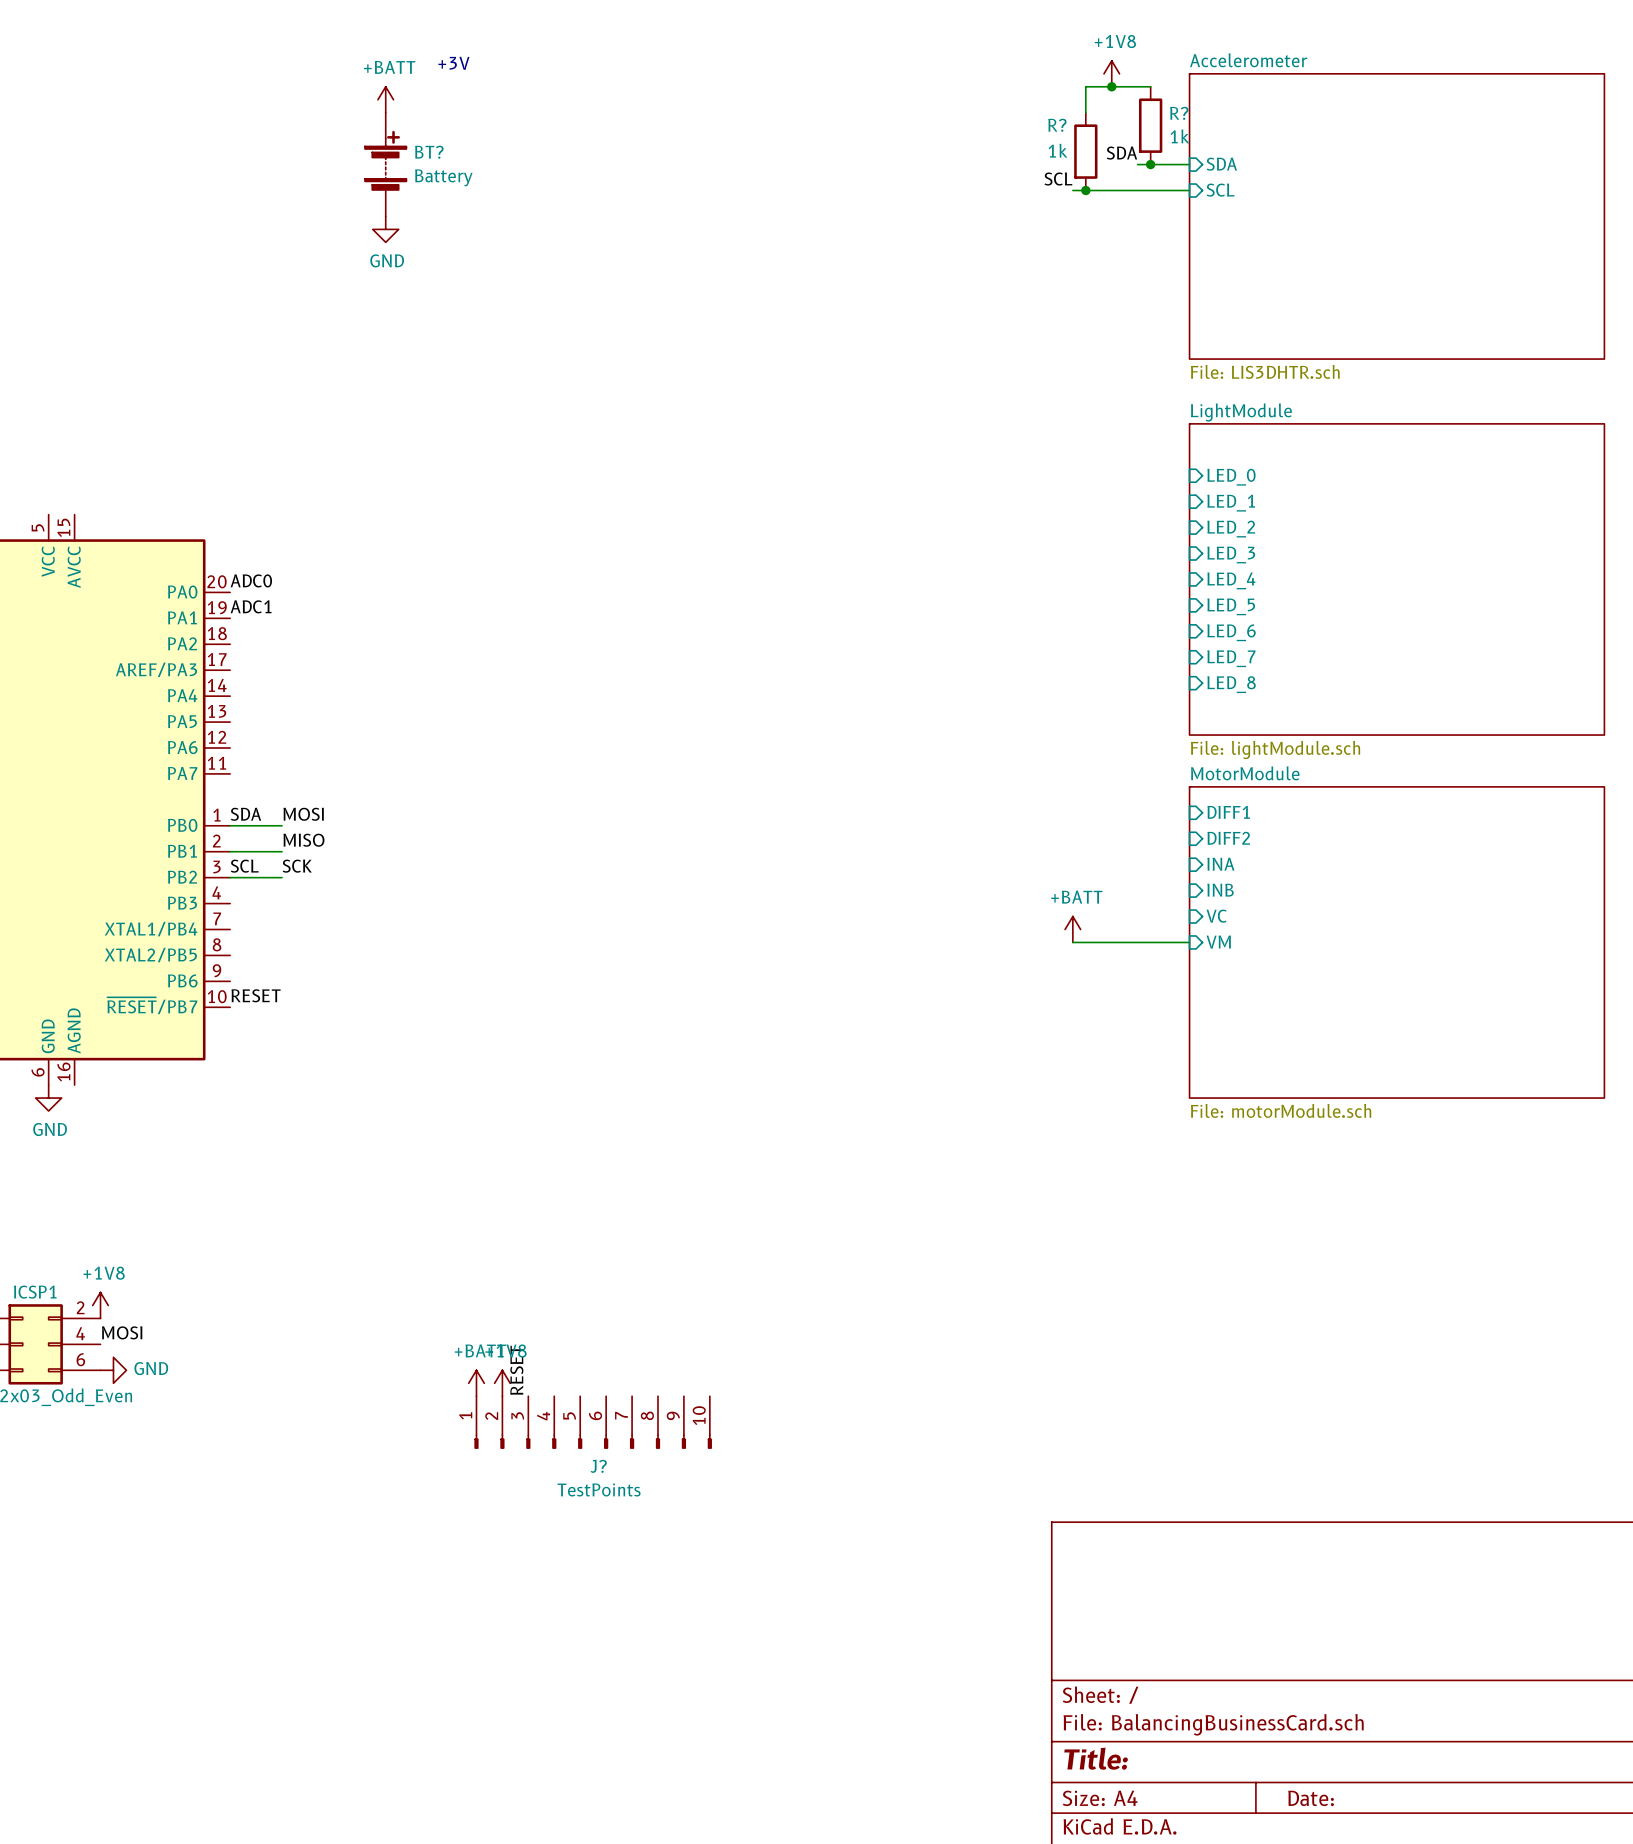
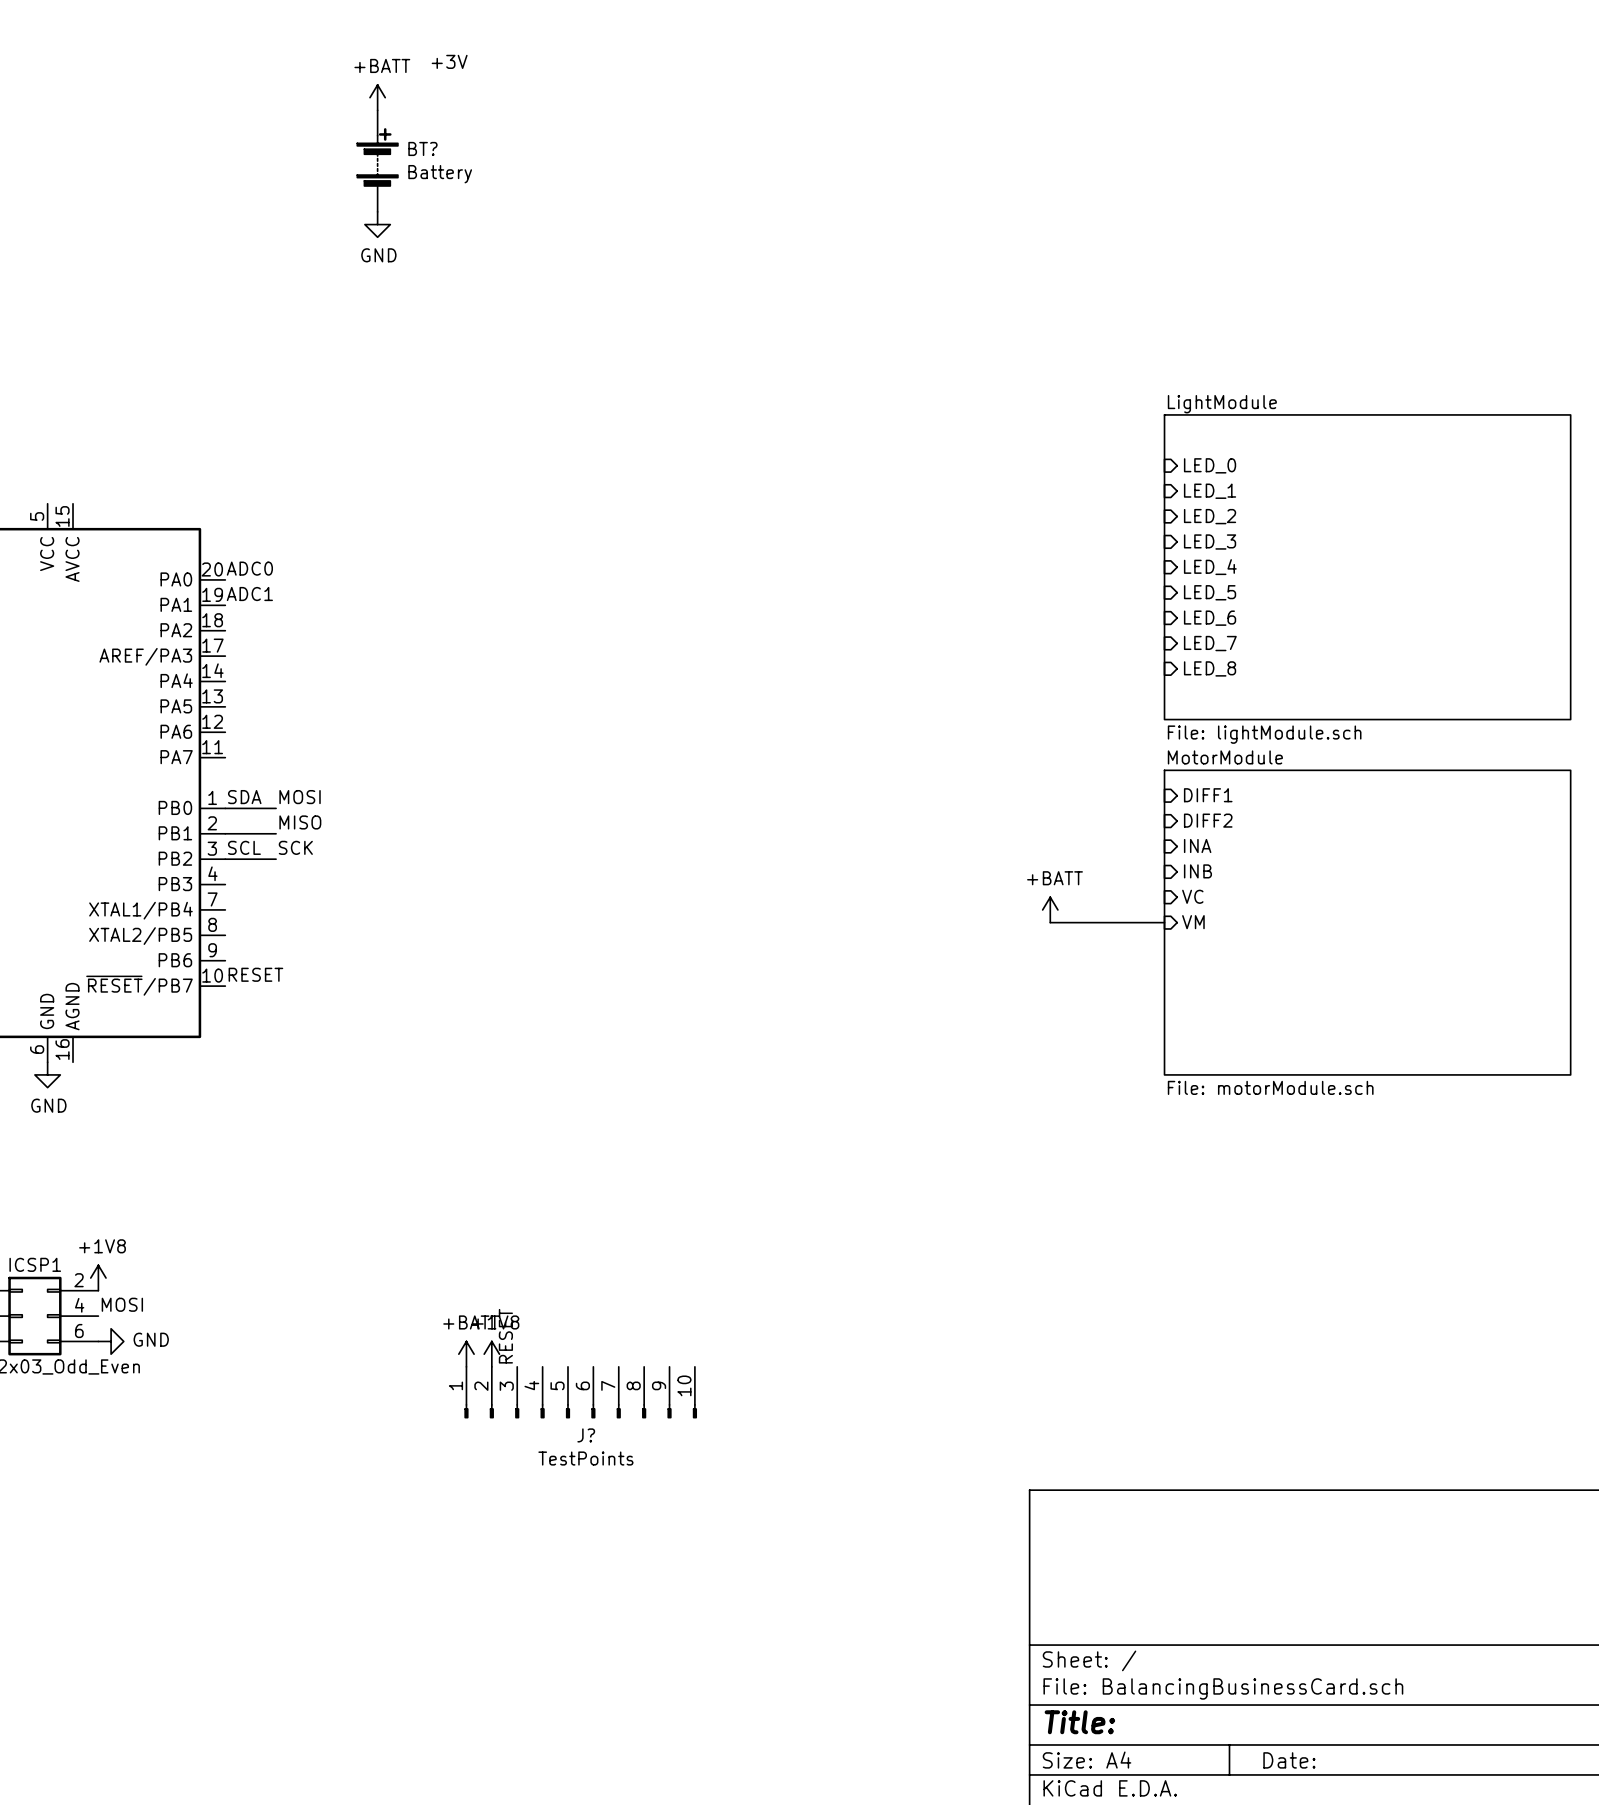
power symbol: +1V8 (1111, 73) -> none
junction: (1111, 86) -> none
wire: (1150, 86) (1085, 86) (1085, 112) -> none
R?: 1k (1150, 125) -> none
R?: 1k (1085, 151) -> none
label: SDA (1121, 153) -> none
wire: (1137, 164) (1189, 164) -> none
junction: (1150, 164) -> none
sheet pin: SDA (1221, 164) -> none
label: SCL (1058, 179) -> none
wire: (1072, 190) (1189, 190) -> none
junction: (1085, 190) -> none
sheet pin: SCL (1220, 190) -> none
sheet Accelerometer: File: LIS3DHTR.sch (1396, 216) -> none

